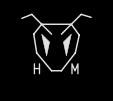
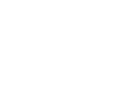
line: (91, 17) (81, 14) (61, 34) -> none
line: (21, 18) (31, 14) (51, 34) -> none
line: (41, 24) (71, 24) (79, 35) (75, 52) (61, 70) (51, 70) (36, 52) (33, 34) (41, 24) -> none
drawing: [41, 33, 50, 57] -> none
drawing: [63, 33, 72, 57] -> none
text: H (36, 68) -> none
text: M (74, 68) -> none

